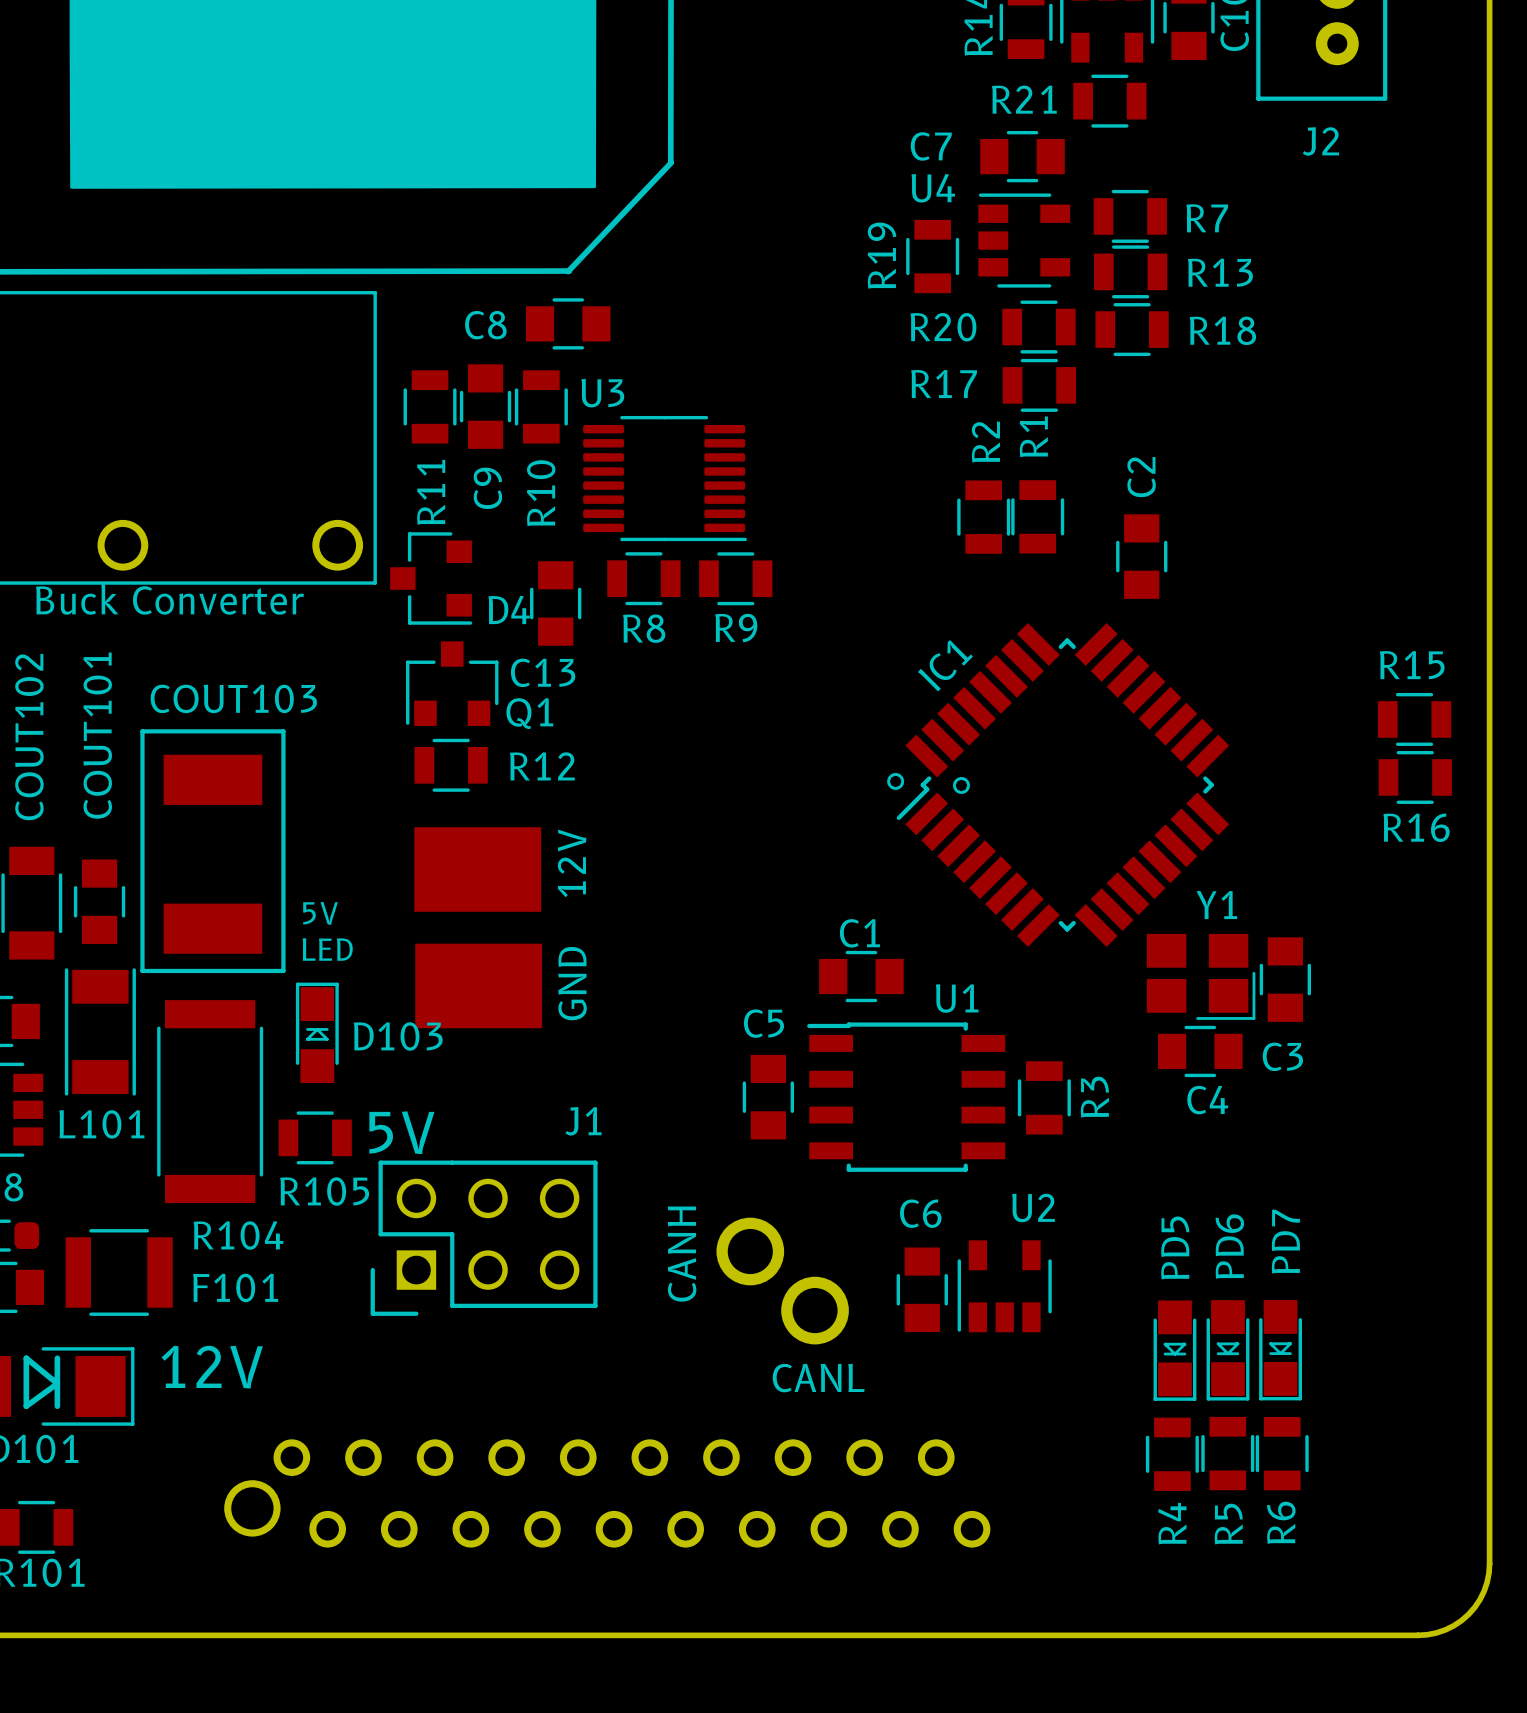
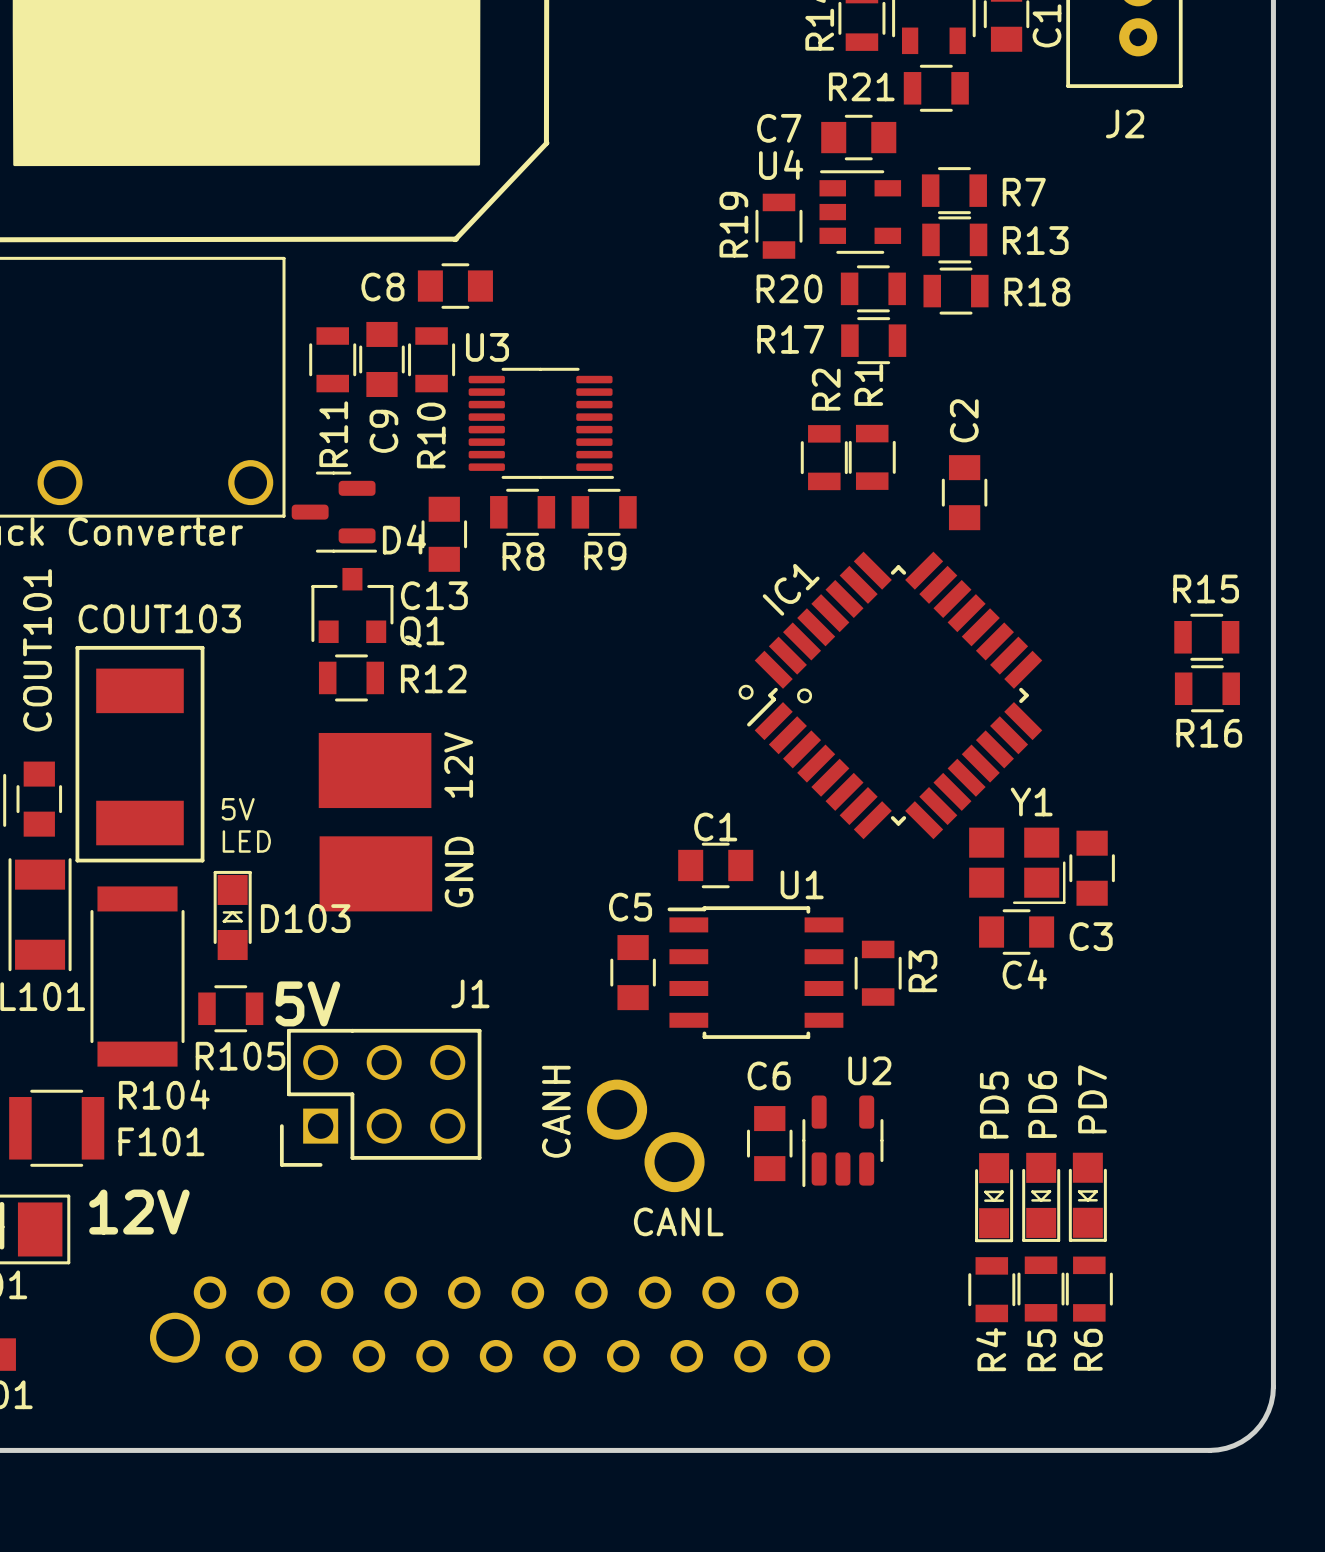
D4 footprint: [390, 532, 473, 625] -> [291, 471, 378, 553]
U2 footprint: [957, 1240, 1052, 1333] -> [802, 1095, 884, 1188]

